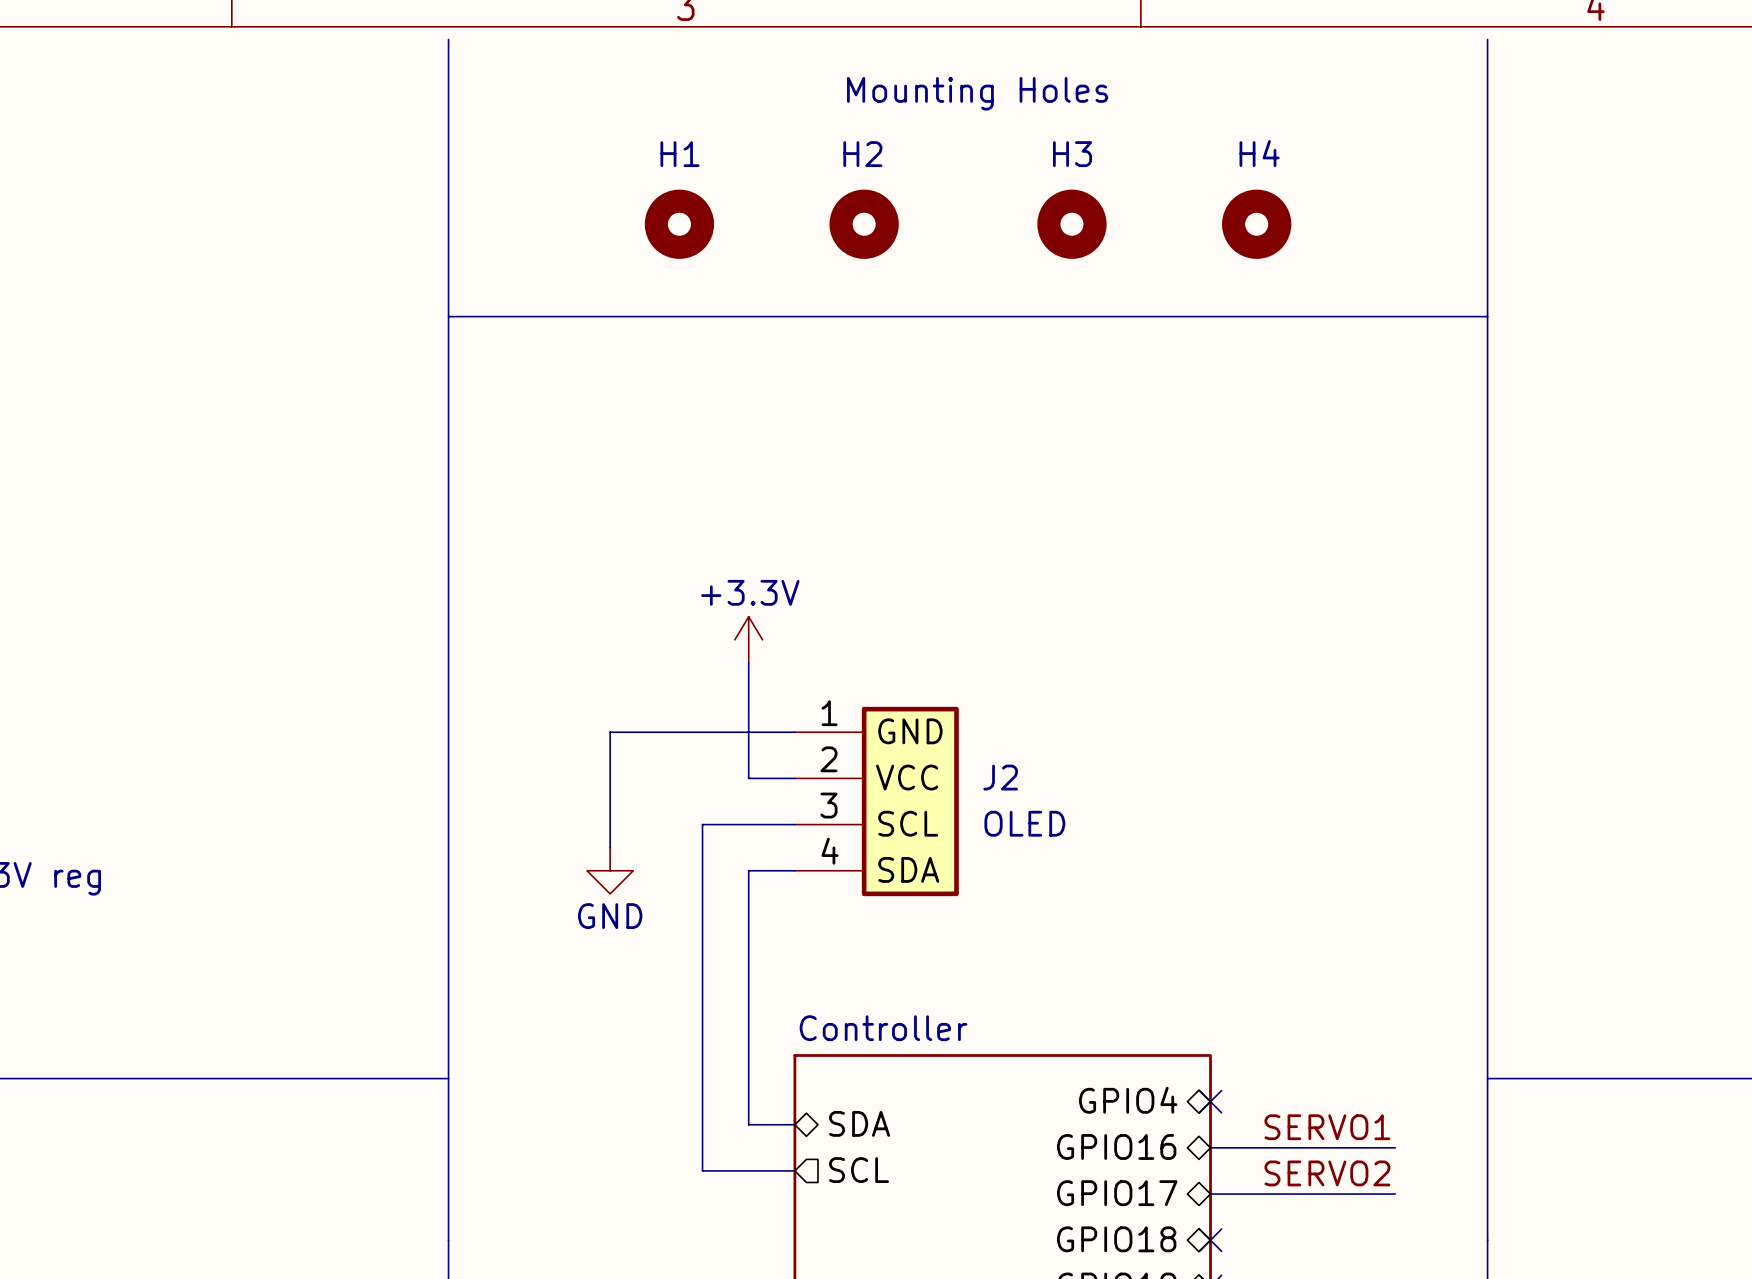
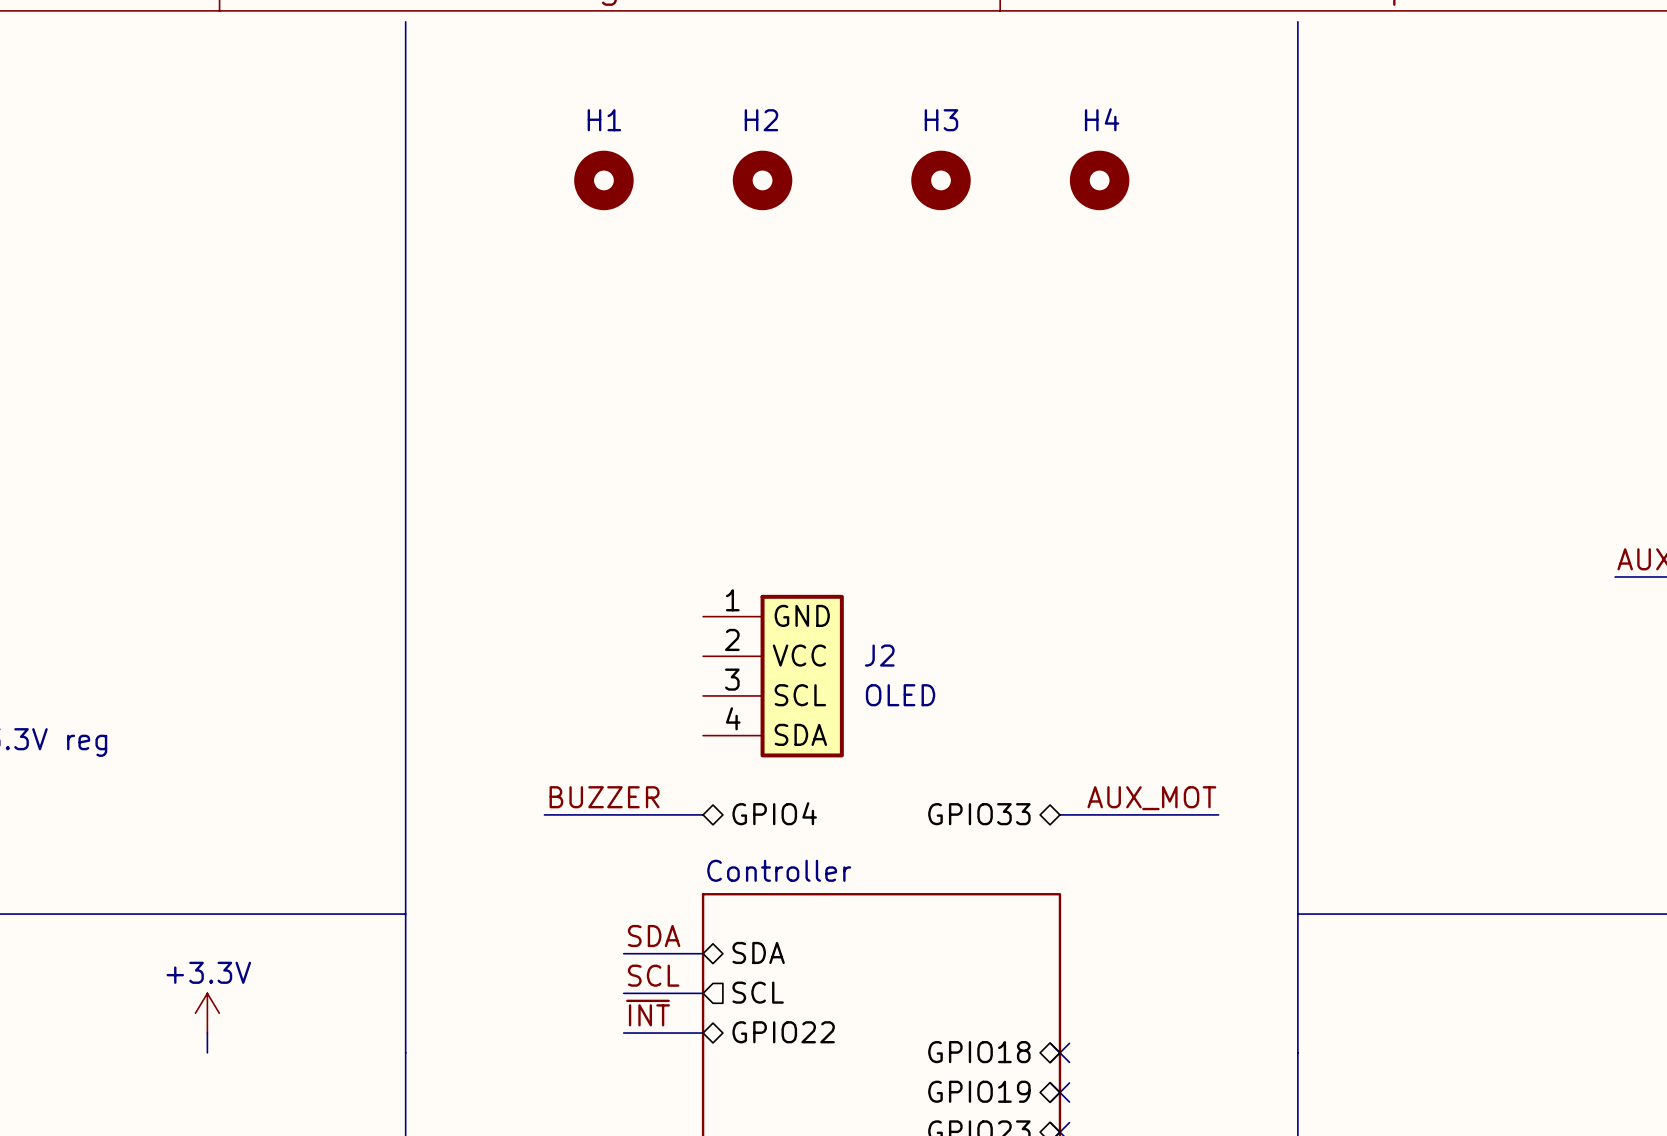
text: Mounting Holes (977, 93) -> none
line: (448, 316) (1487, 316) -> none
power symbol: +3.3V (748, 639) -> none
wire: (748, 662) (748, 778) (794, 778) -> none
wire: (794, 732) (610, 732) (610, 847) -> none
wire: (794, 824) (702, 824) (702, 1170) -> none
power symbol: GND (610, 870) -> none
wire: (794, 870) (748, 870) (748, 1124) -> (623, 953) (663, 953)
label: none -> BUZZER (604, 797)
label: none -> AUX_MOT (1151, 798)
sheet pin: none -> GPIO33 (979, 814)
wire: none -> (544, 814) (703, 814)
sheet pin rotation: 0° (1128, 1100) -> 180° (774, 813)
sheet pin position: GPIO4 (1128, 1100) -> GPIO4 (774, 813)
no-connect mark: (1210, 1101) -> none
label: none -> SDA (654, 936)
label: SERVO1 (1327, 1127) -> none
sheet pin: GPIO16 (1116, 1146) -> none
wire: (1210, 1147) (1395, 1147) -> (1059, 814) (1218, 814)
label: none -> SCL (653, 975)
label: SERVO2 (1327, 1173) -> none
label: none -> ~{INT} (648, 1013)
sheet pin: GPIO17 (1117, 1193) -> none
power symbol: none -> +3.3V (207, 1013)
wire: (1210, 1194) (1395, 1194) -> none
sheet pin: none -> GPIO22 (783, 1032)
wire: none -> (207, 1033) (207, 1052)
wire: none -> (623, 1033) (703, 1033)

